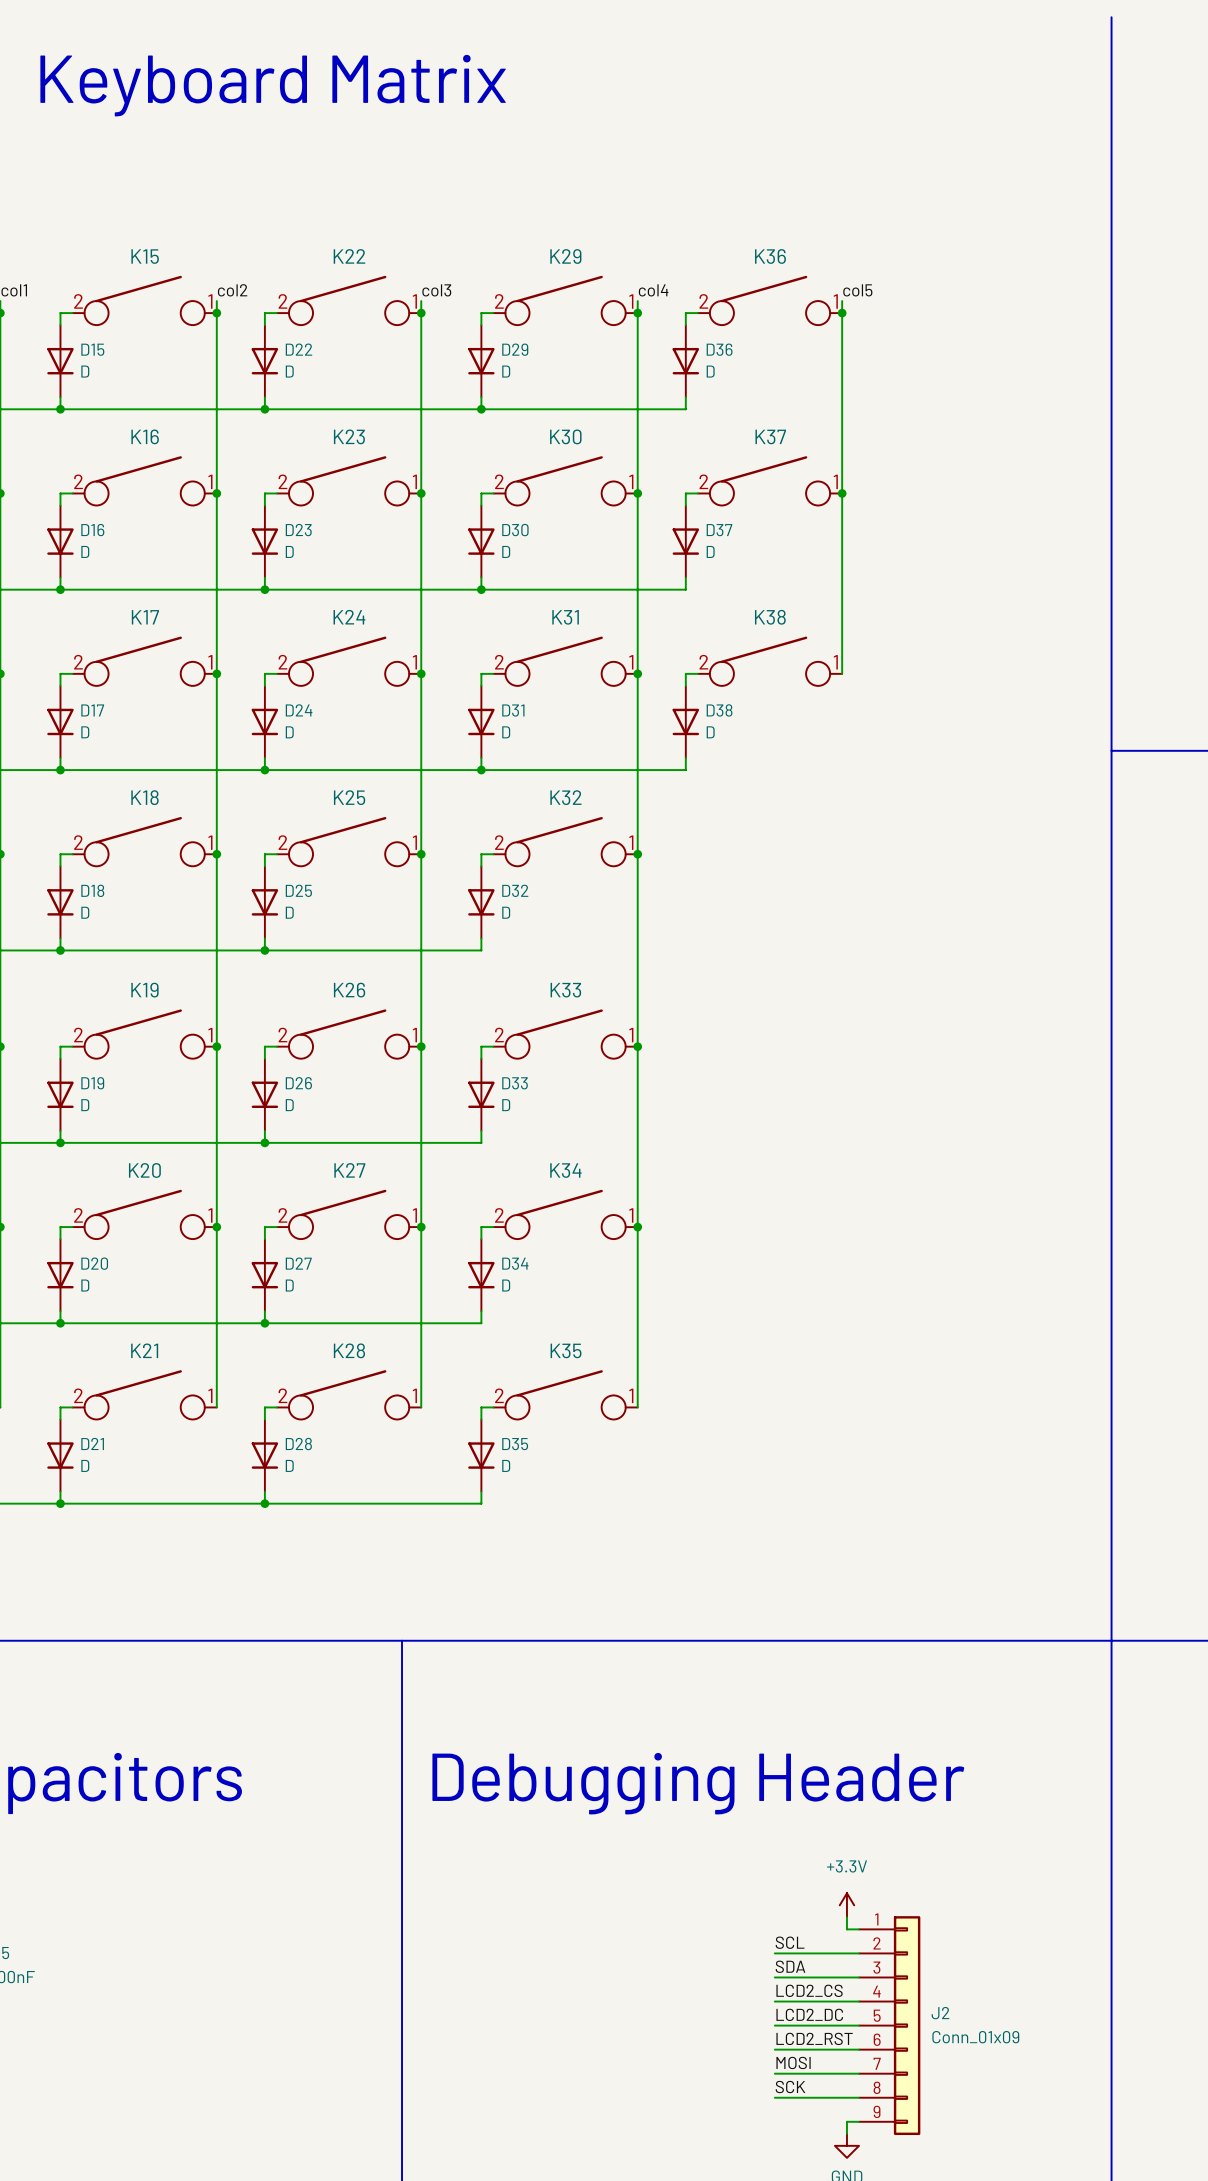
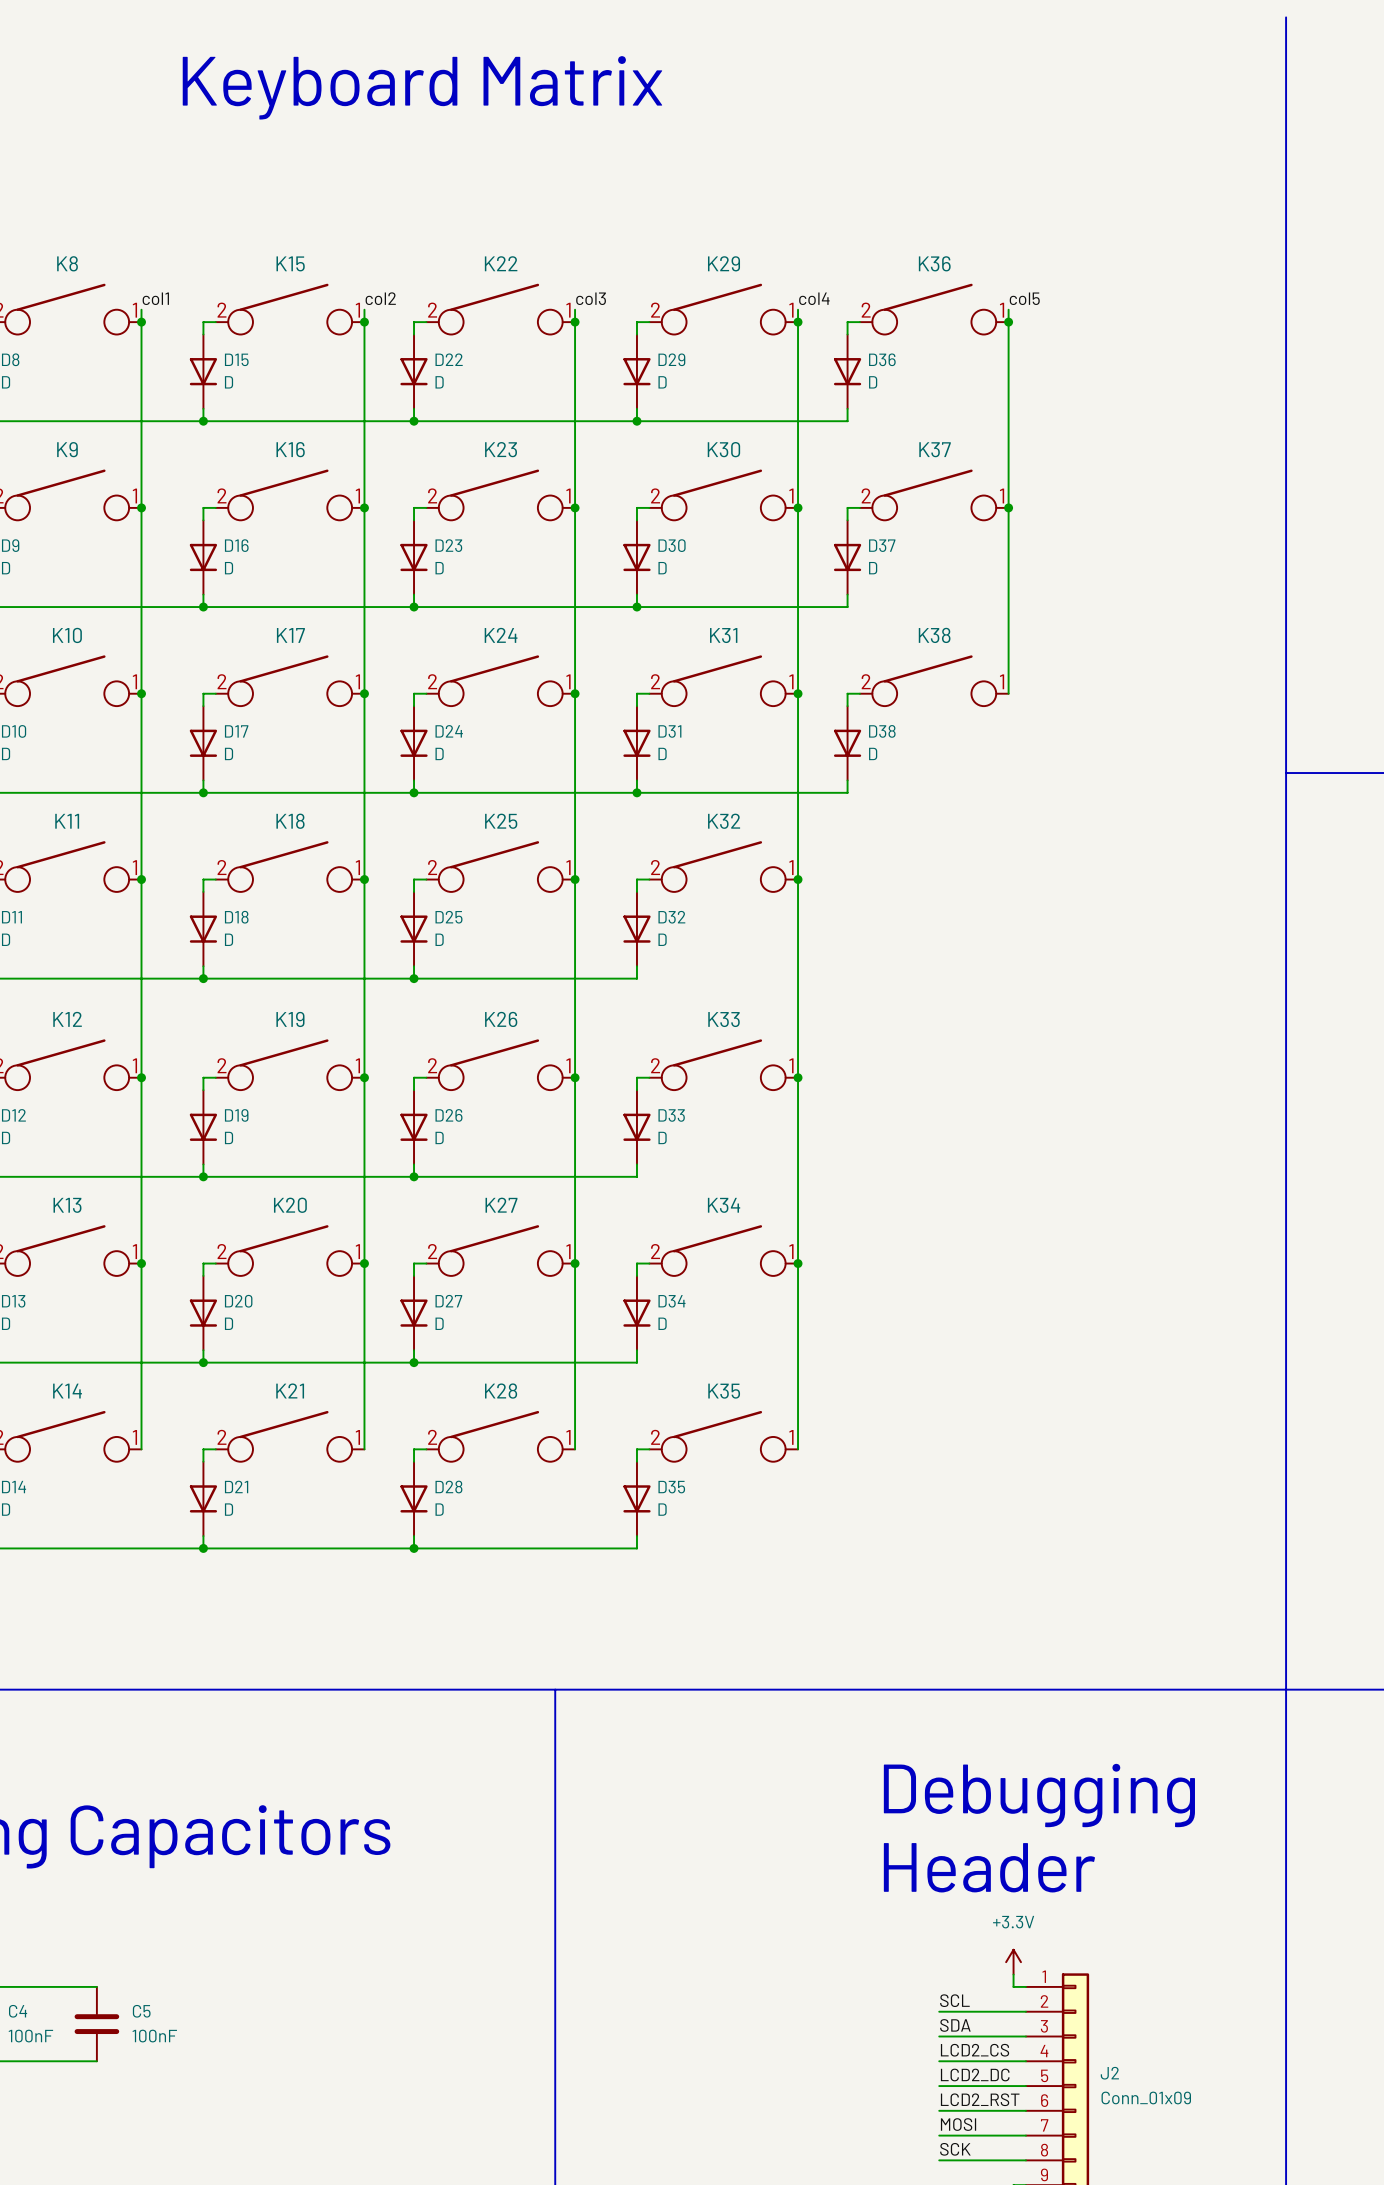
text: none -> Debugging (1039, 1795)
text: Debugging Header (698, 1783) -> none
text: none -> Header (989, 1867)

